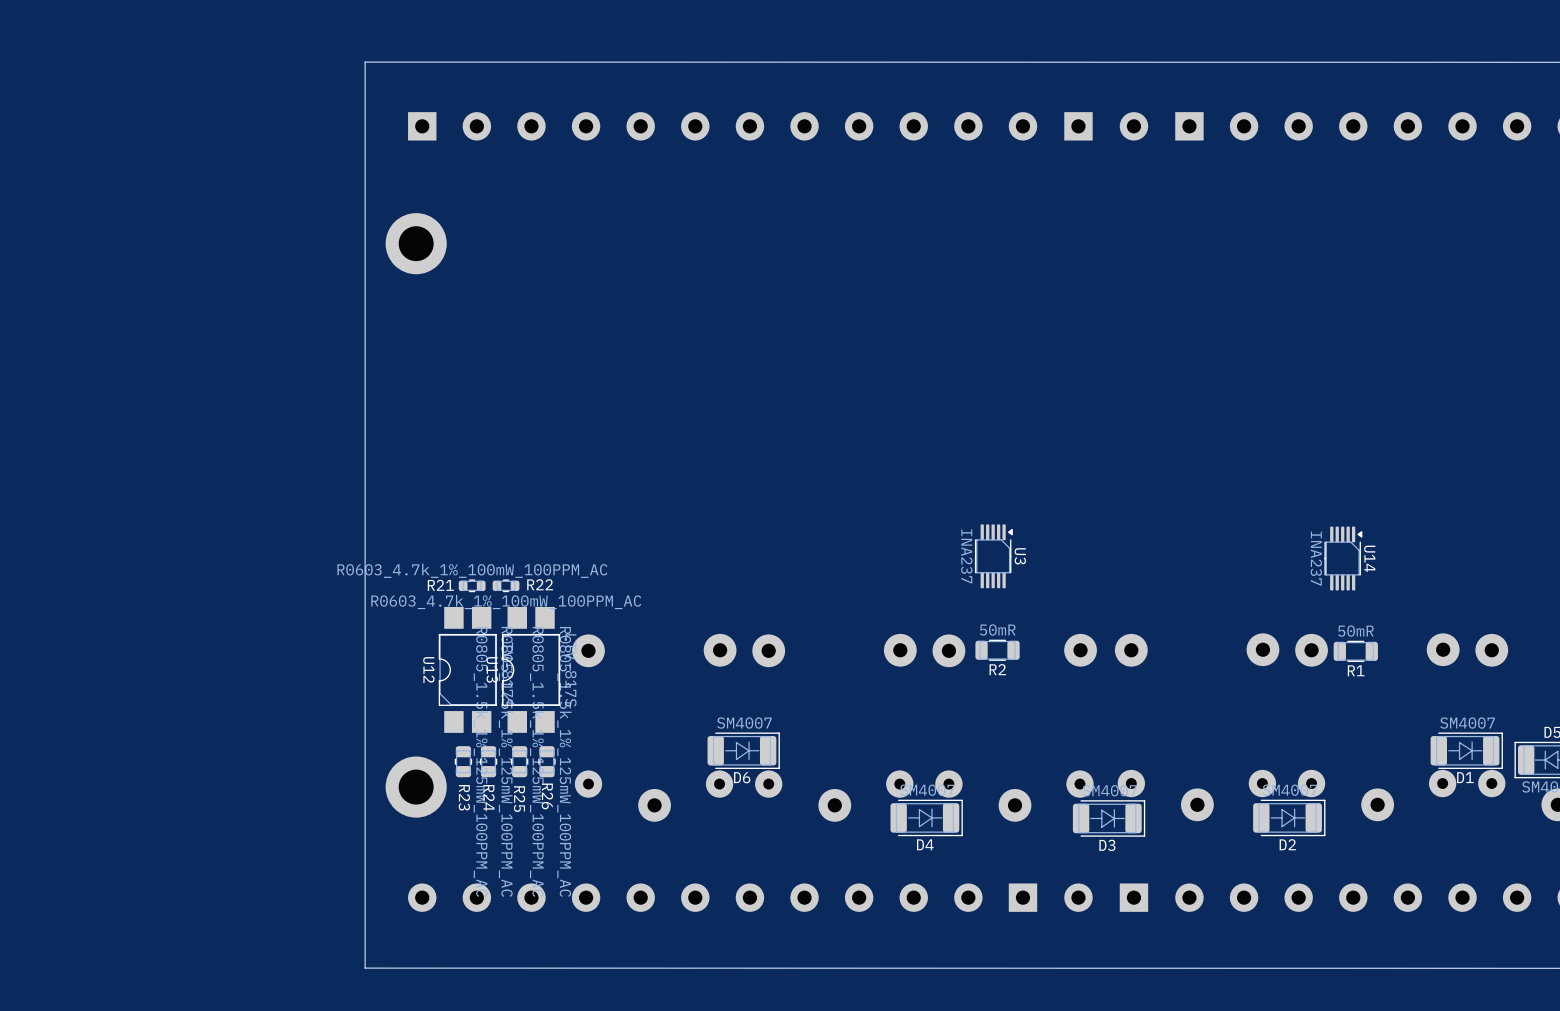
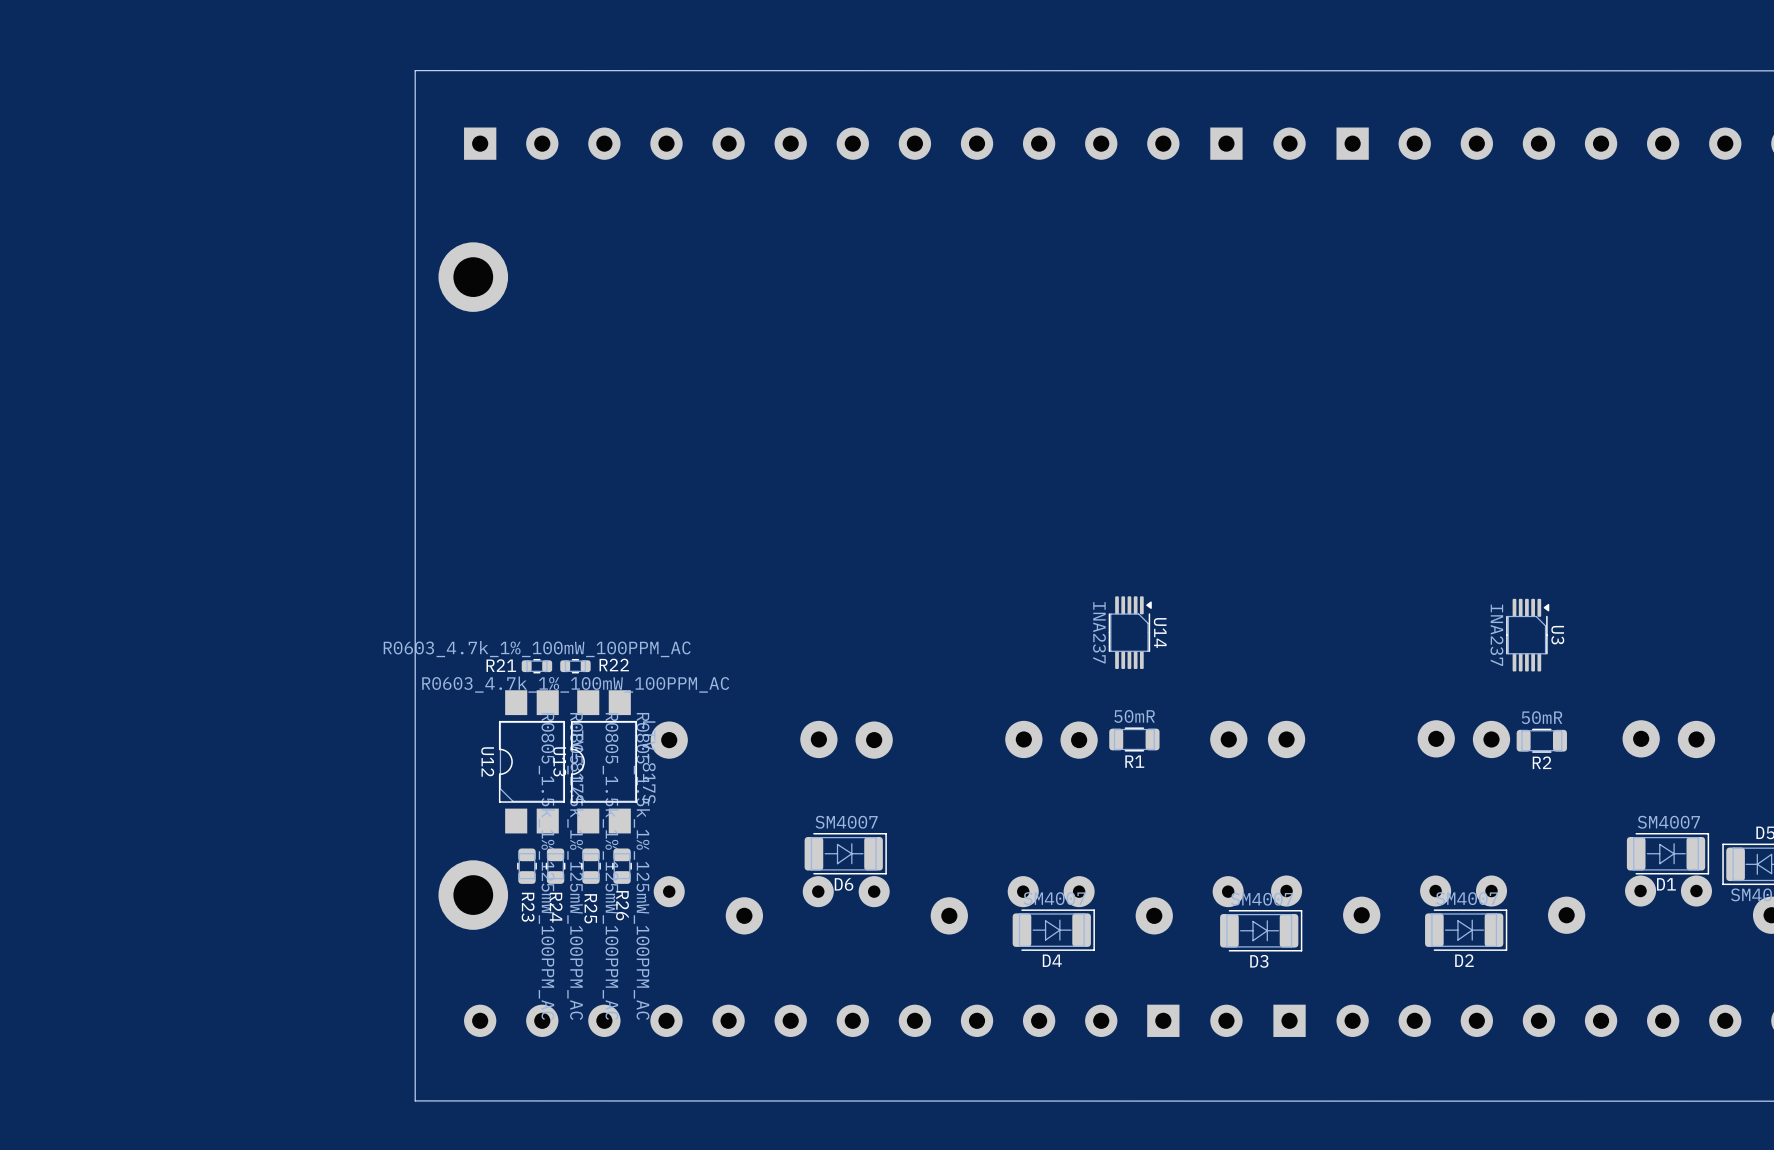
U3 name: U3 (1020, 556) -> U14 (1160, 633)
U14 name: U14 (1369, 558) -> U3 (1557, 635)
R2 name: R2 (997, 669) -> R1 (1134, 761)
R1 name: R1 (1356, 670) -> R2 (1542, 762)

